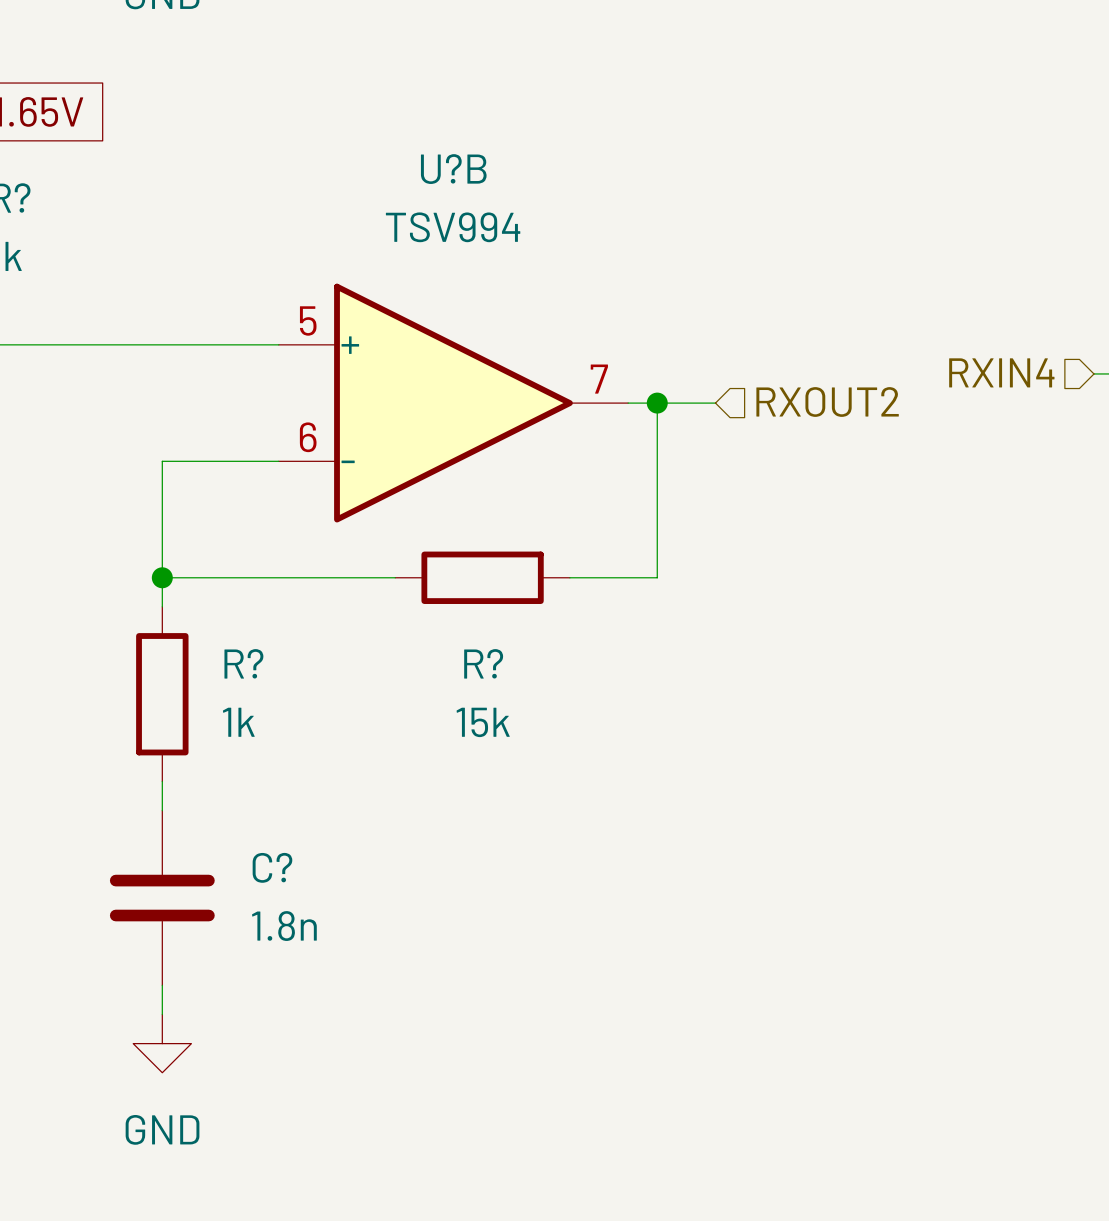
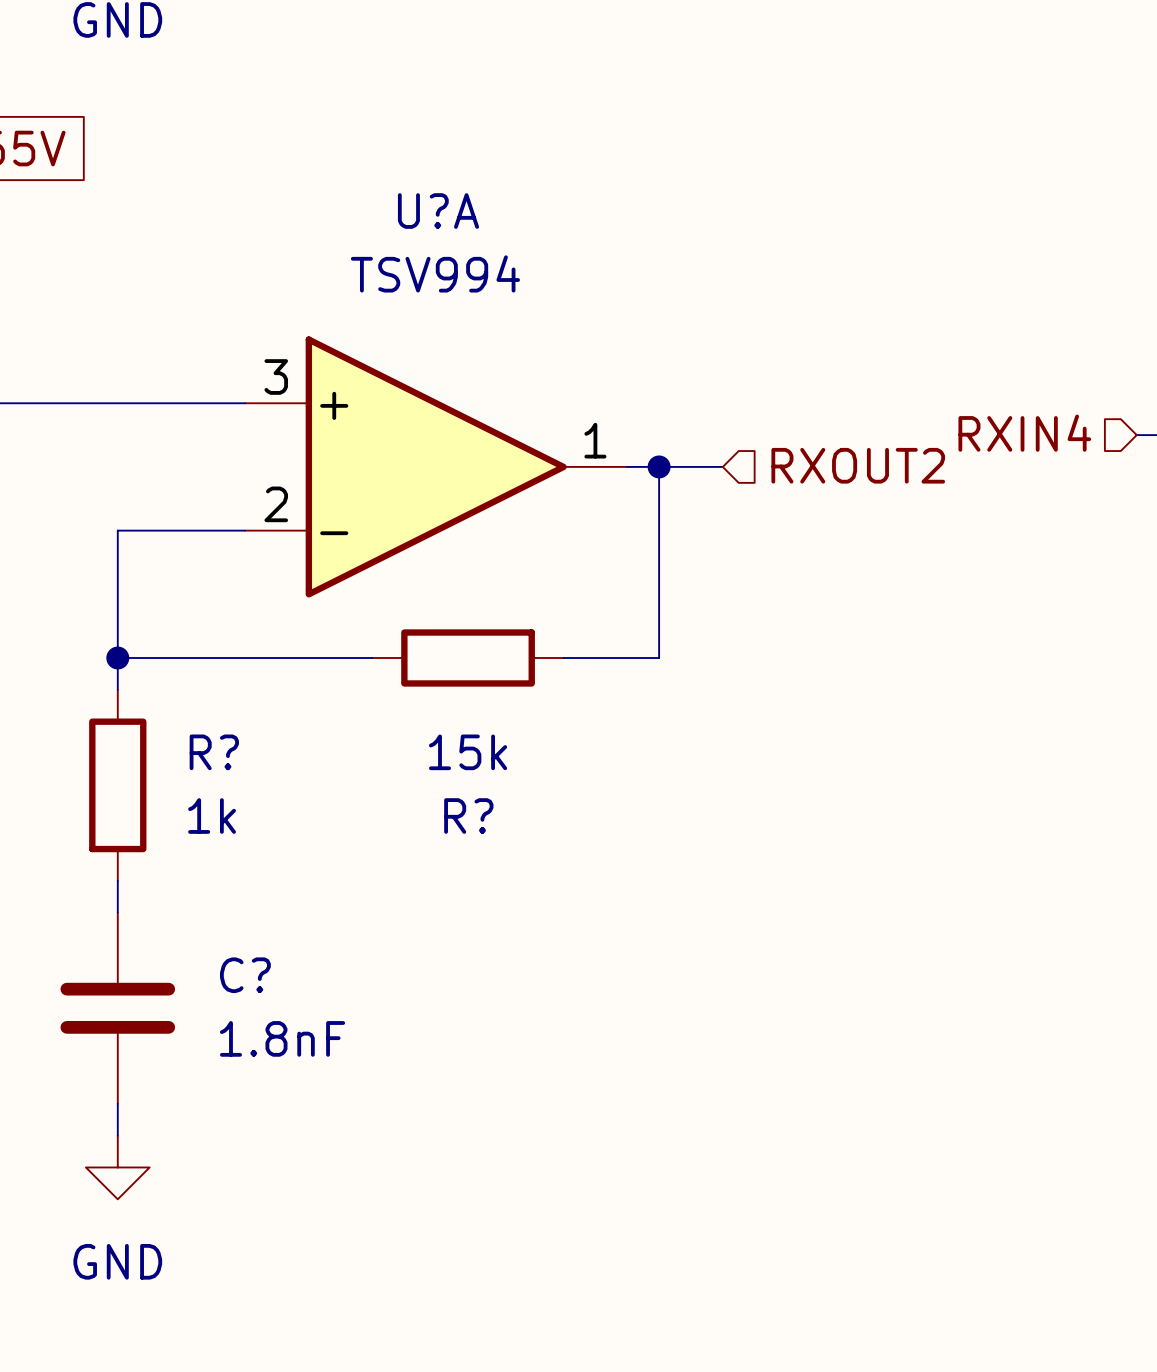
U?B name: U?B (453, 169) -> U?A (438, 211)
U?B pin number: 5 (308, 320) -> 3 (276, 376)
U?B pin number: 7 (599, 379) -> 1 (595, 440)
U?B pin number: 6 (308, 437) -> 2 (276, 504)
R? name position: R? (483, 663) -> R? (468, 816)
R? value position: 15k (483, 722) -> 15k (468, 752)
C? value: 1.8n (284, 926) -> 1.8nF (282, 1038)

